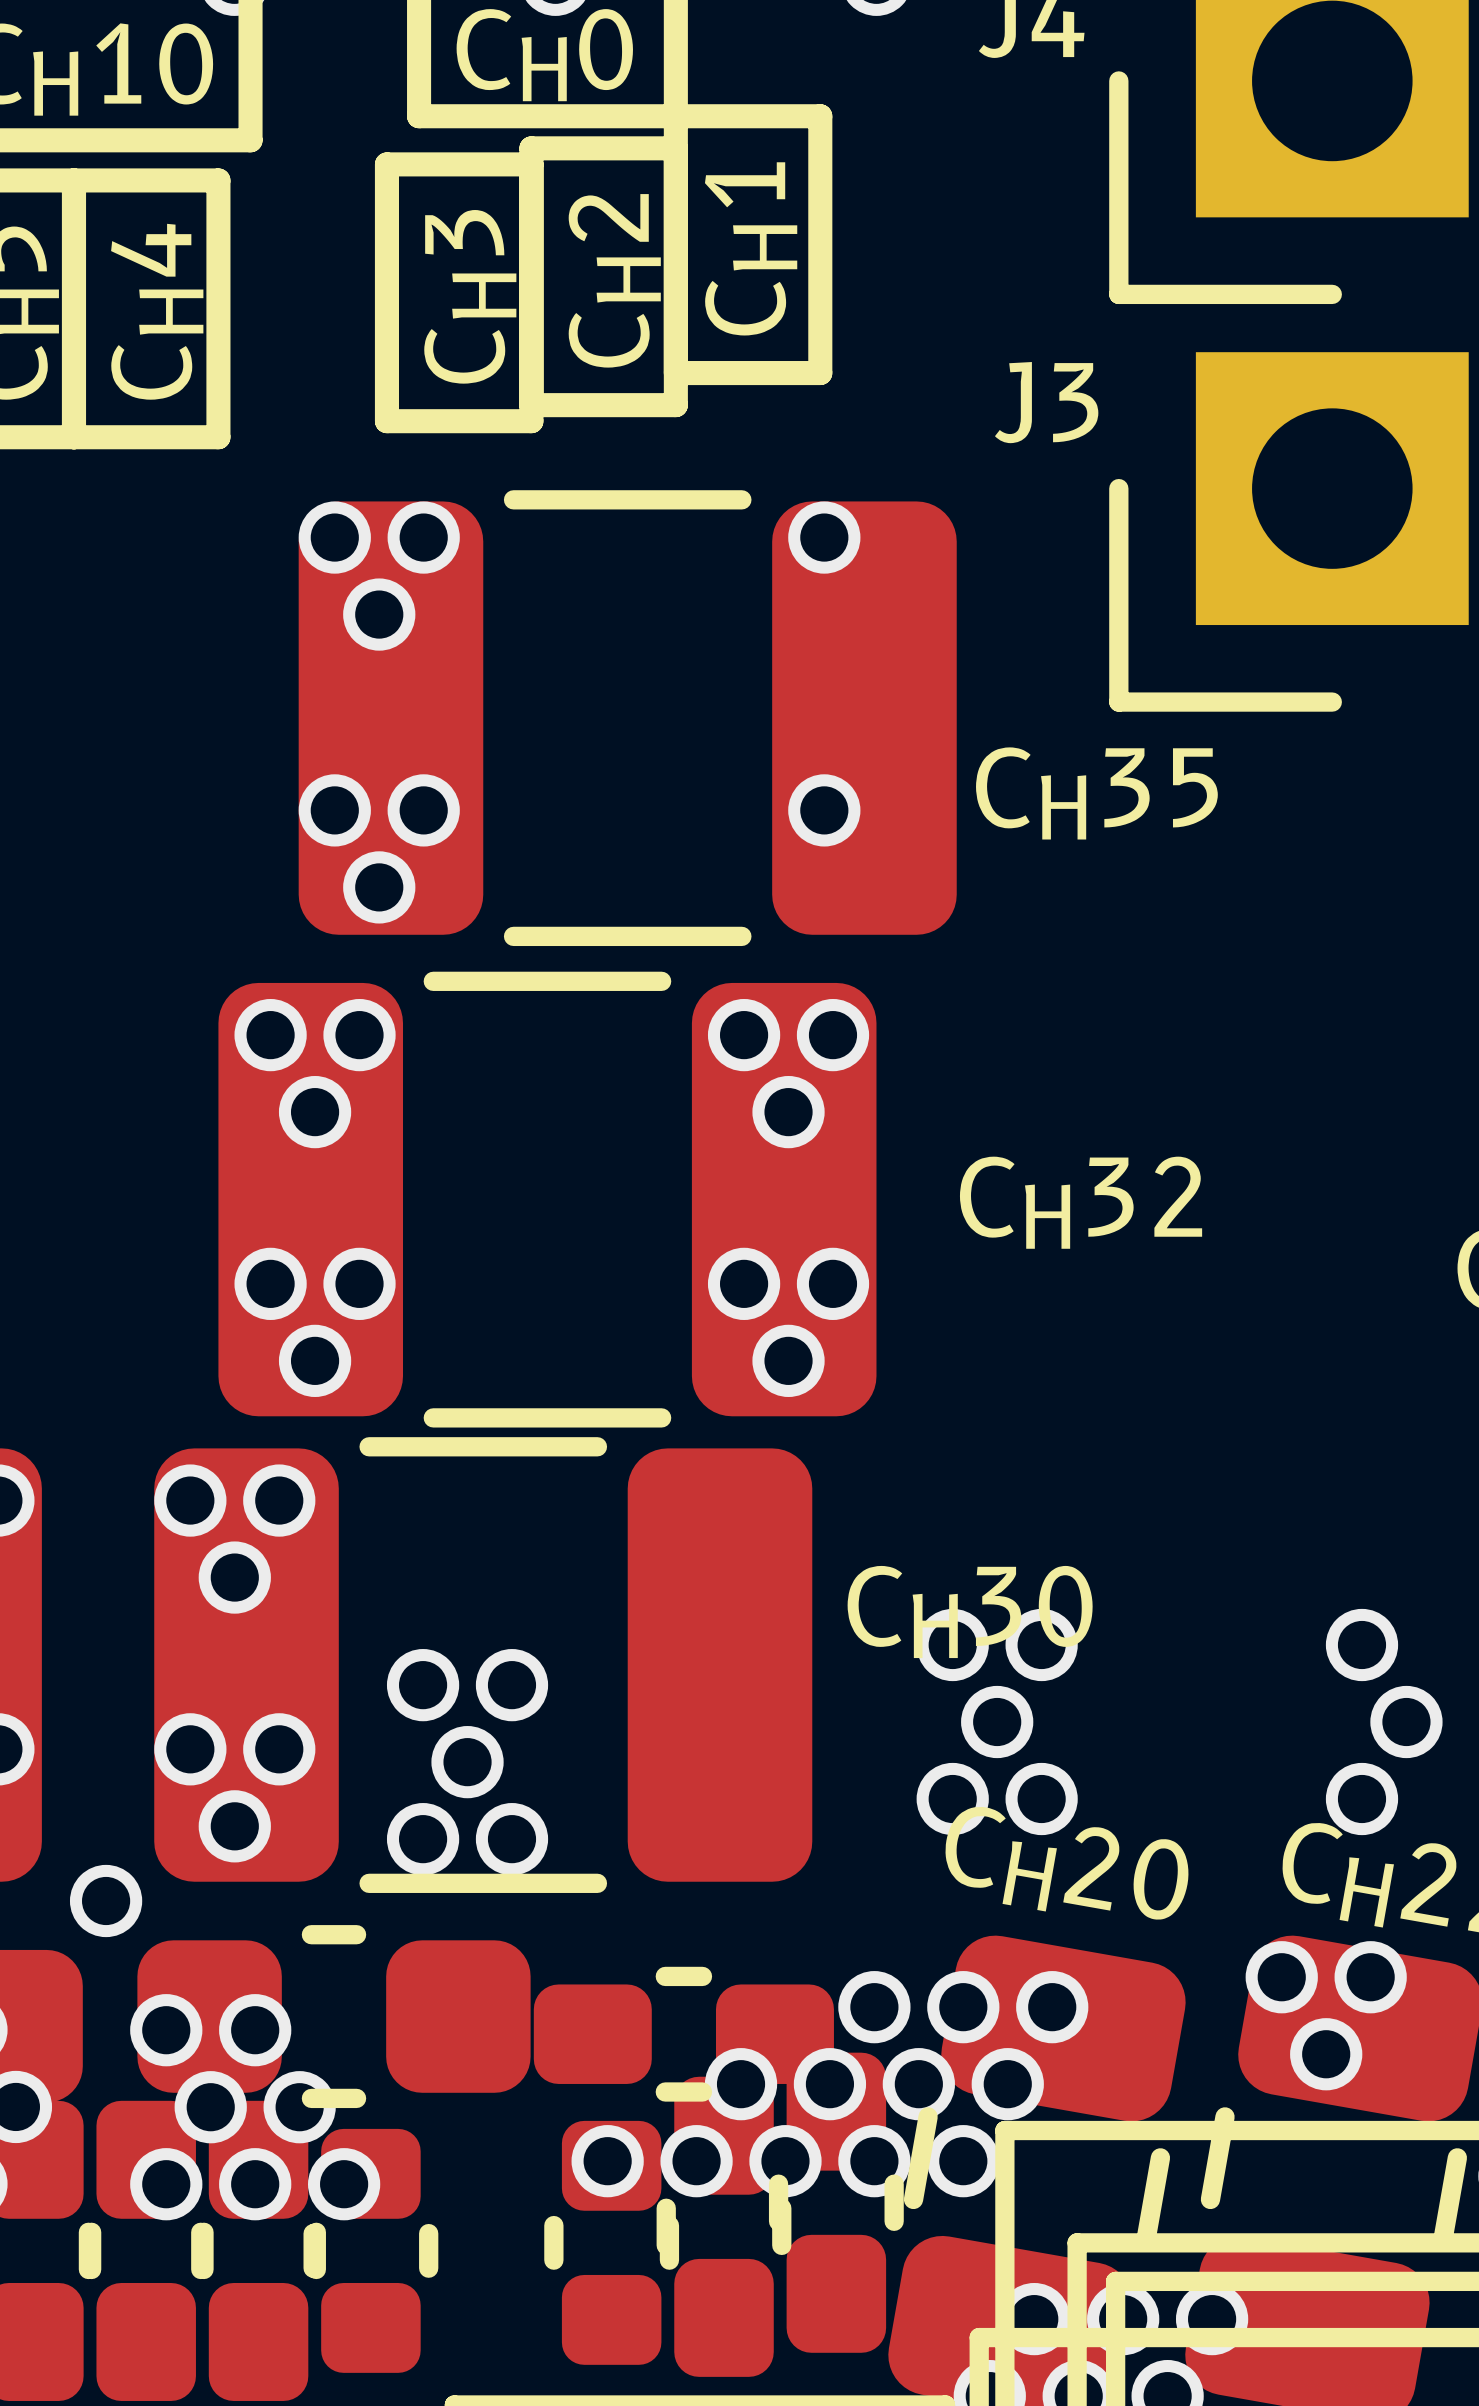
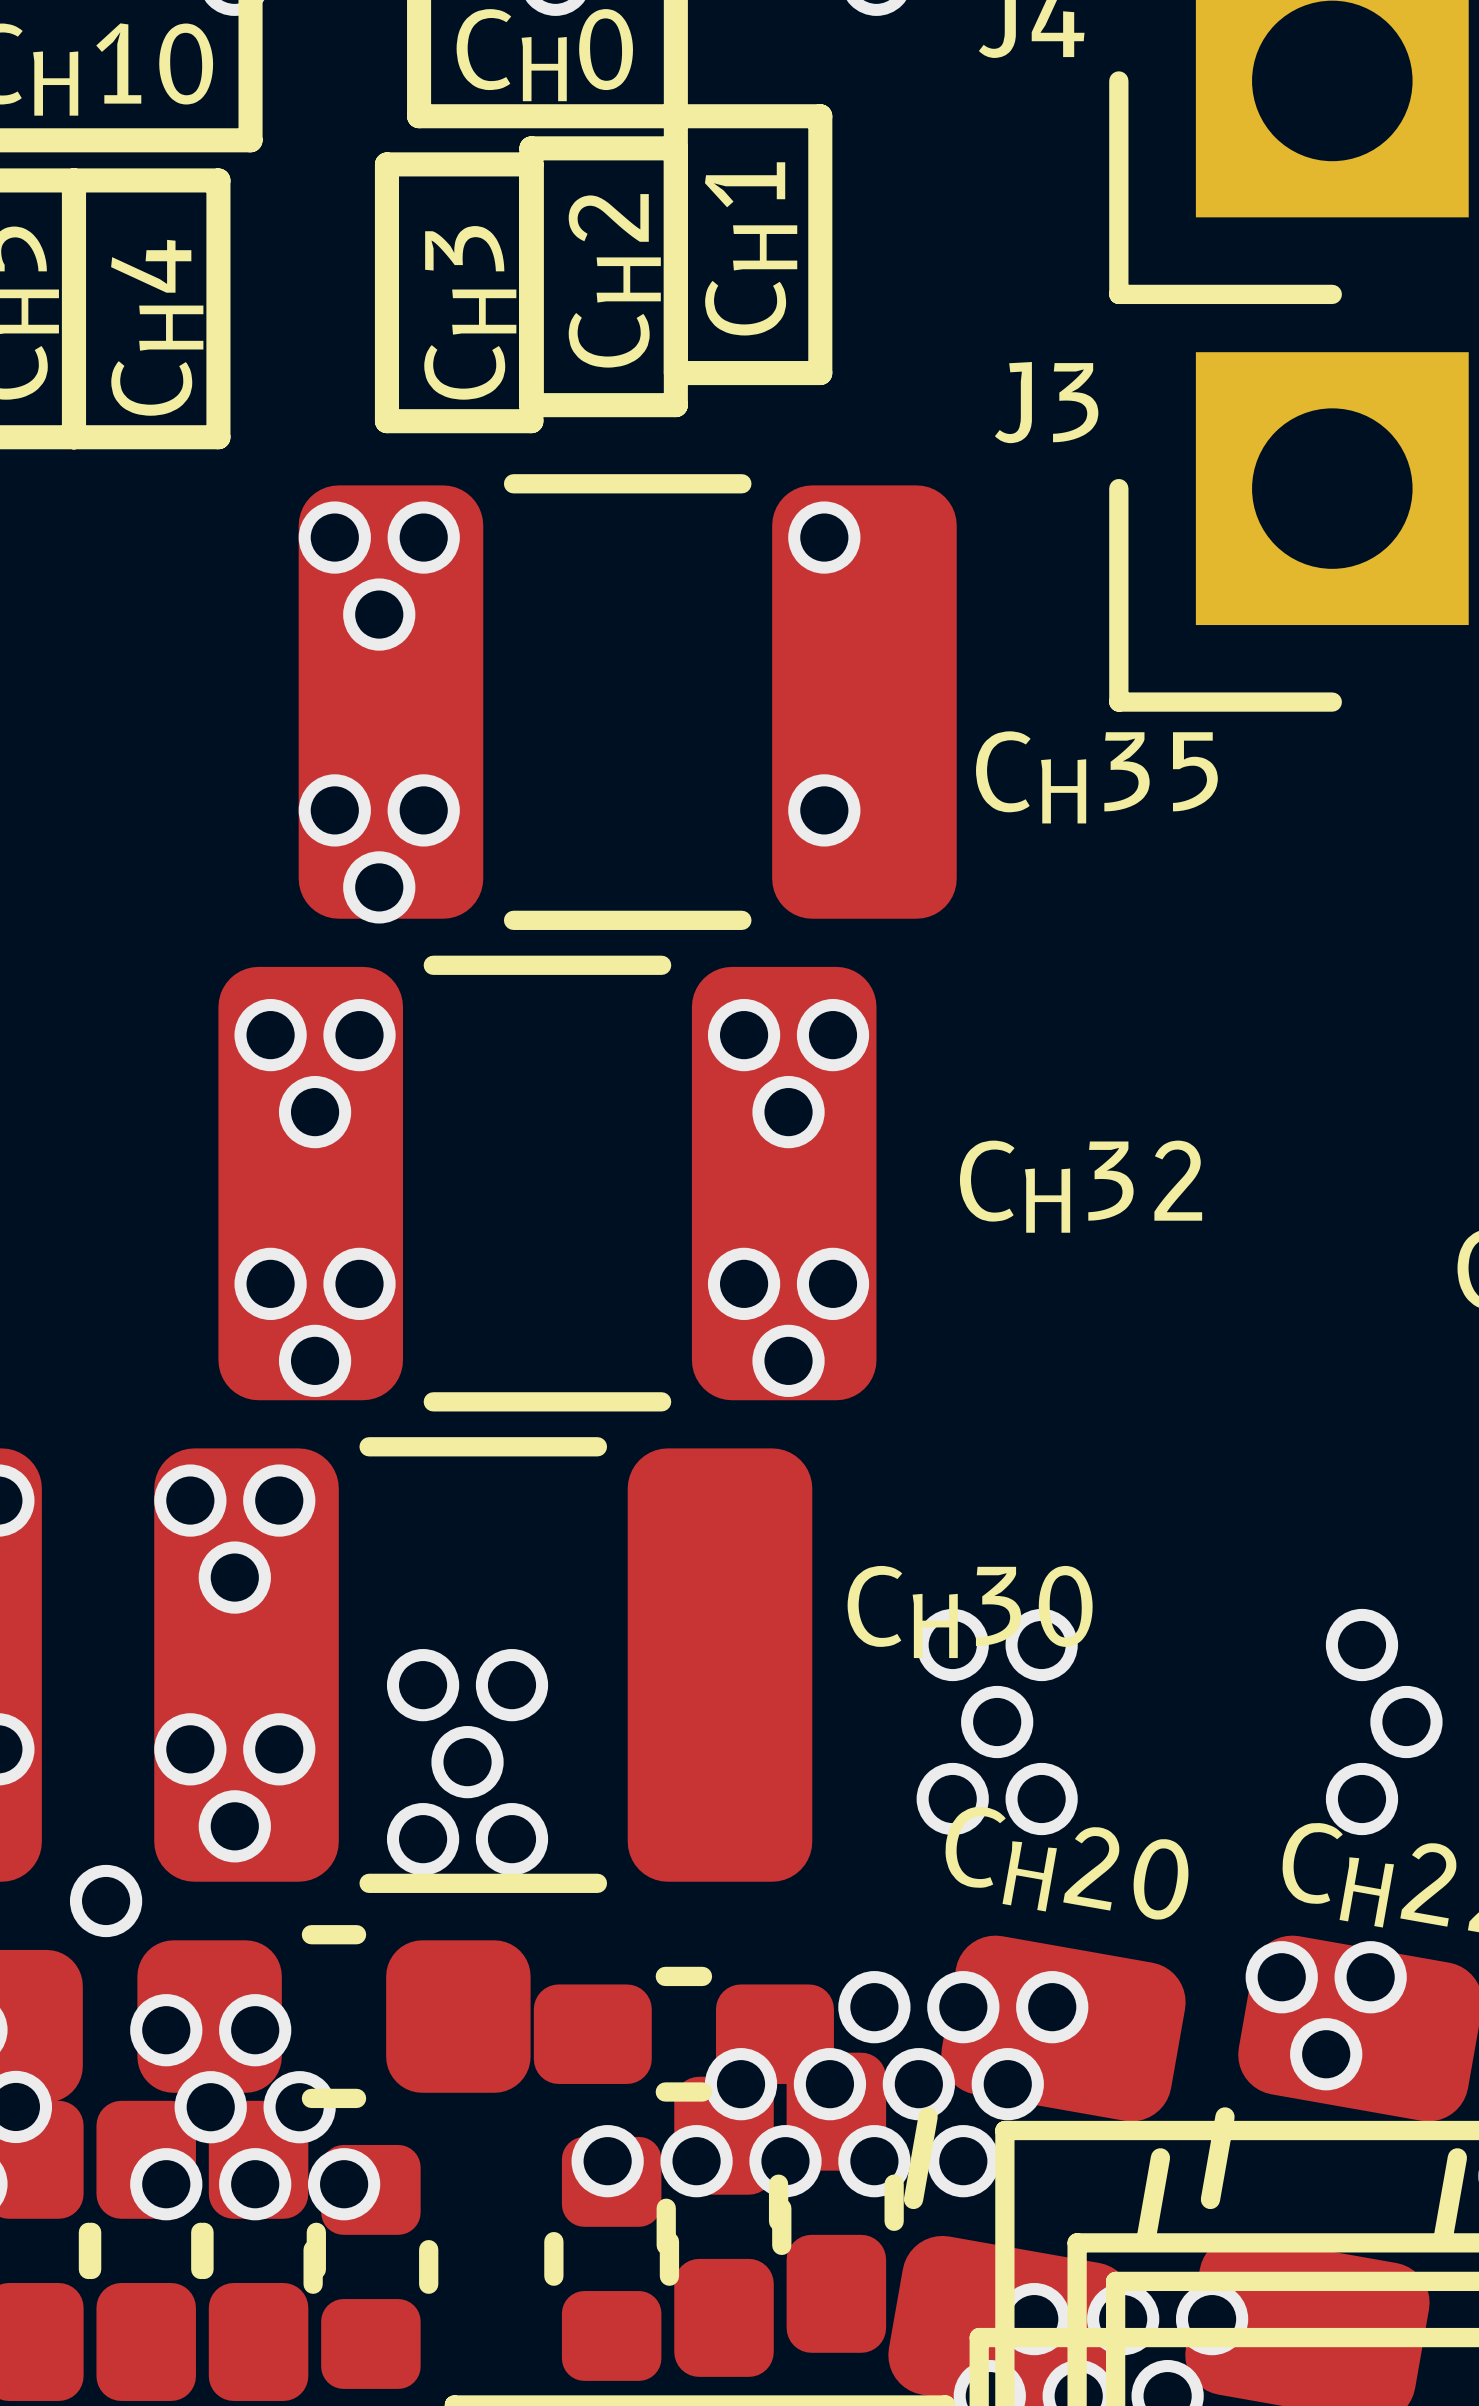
CH35 position: (627, 718) -> (627, 702)
CH32 position: (547, 1199) -> (547, 1183)
CH3 position: (611, 2242) -> (611, 2258)
CH4 position: (370, 2250) -> (370, 2266)

